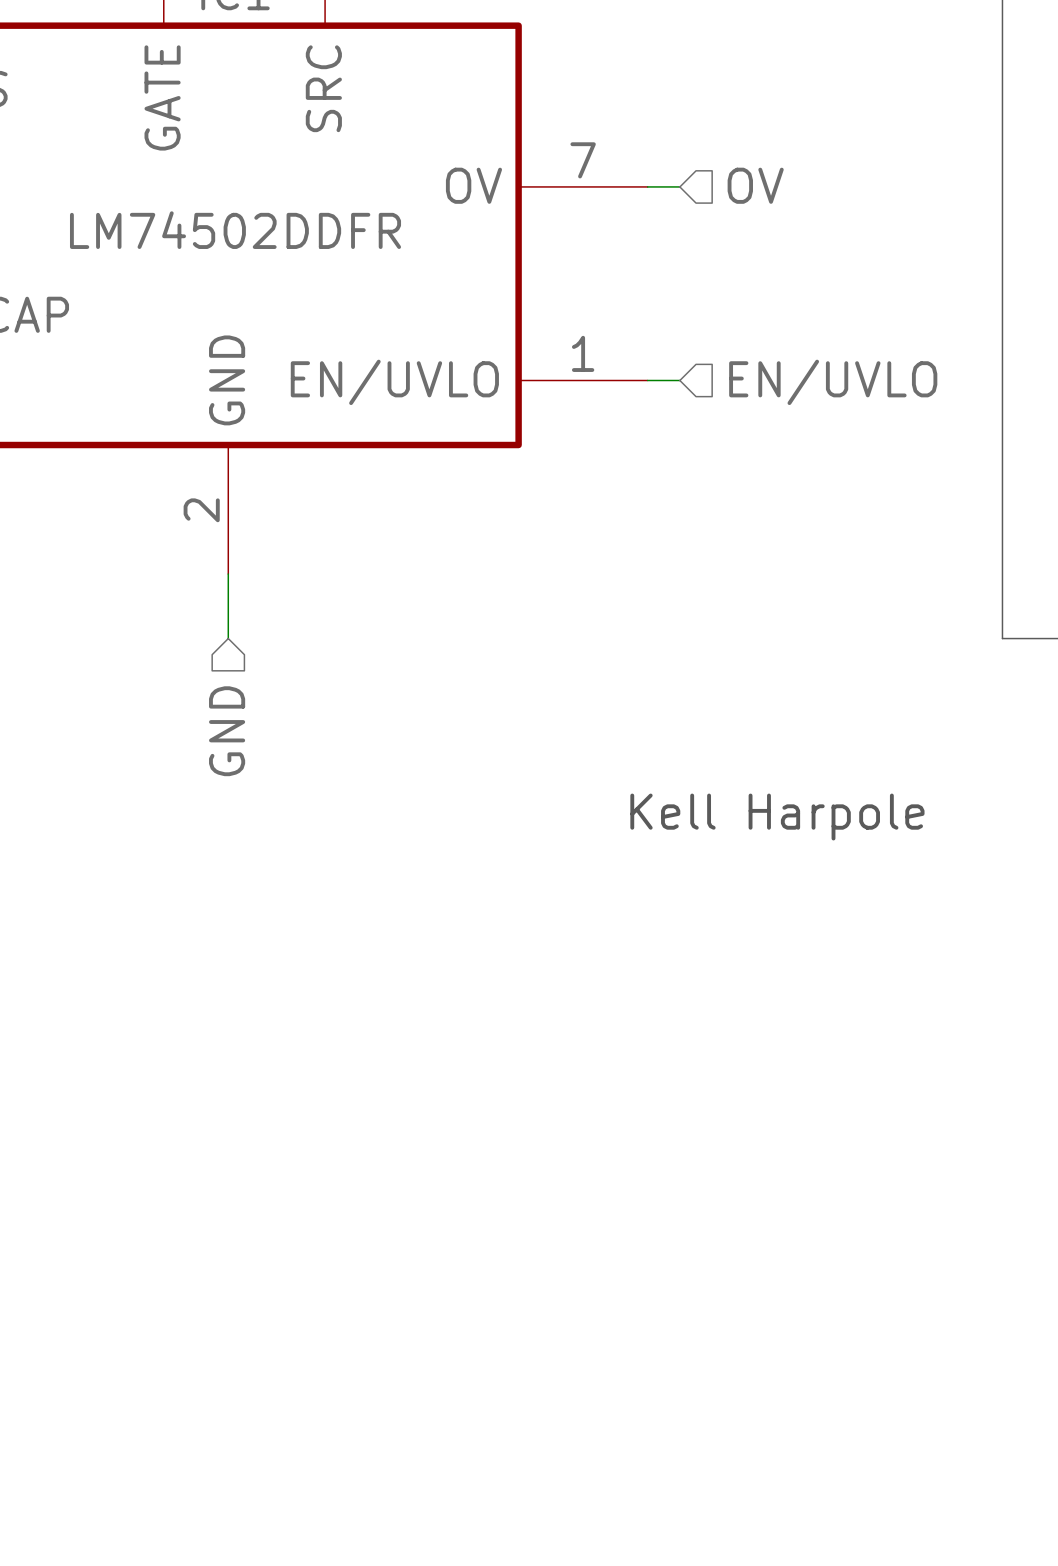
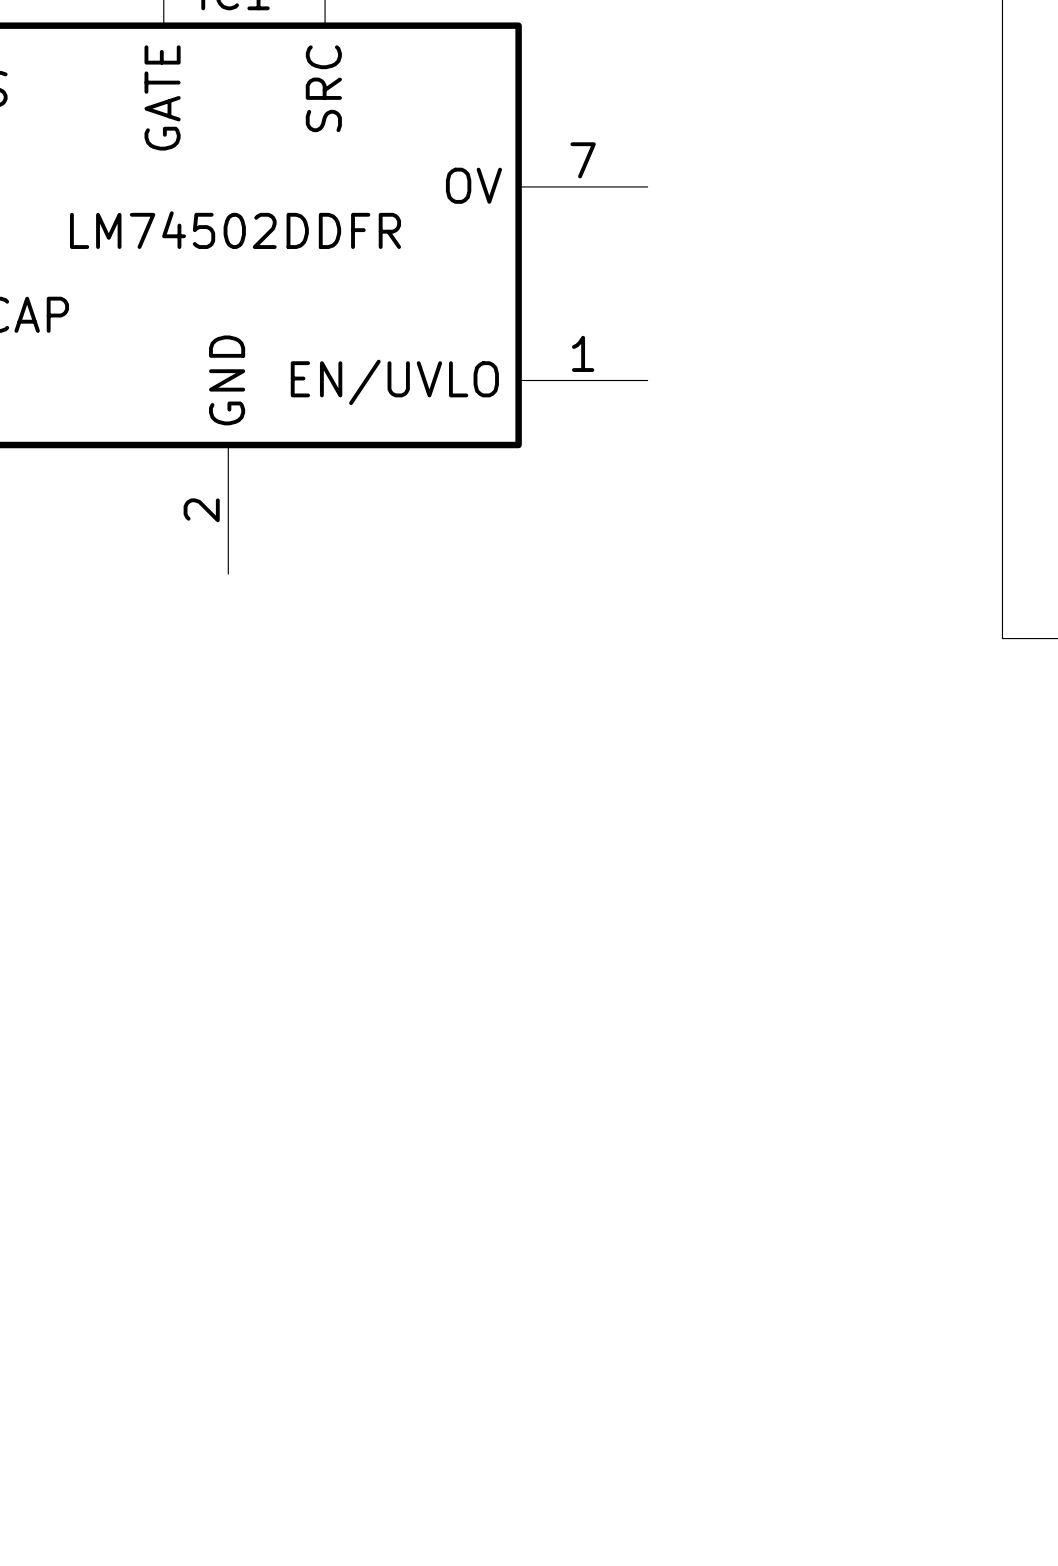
hierarchical label: OV (755, 185) -> none
wire: (647, 186) (679, 186) -> none
wire: (647, 380) (679, 380) -> none
hierarchical label: EN/UVLO (833, 382) -> none
wire: (228, 574) (228, 638) -> none
hierarchical label: GND (227, 731) -> none
text: Kell Harpole (777, 817) -> none

